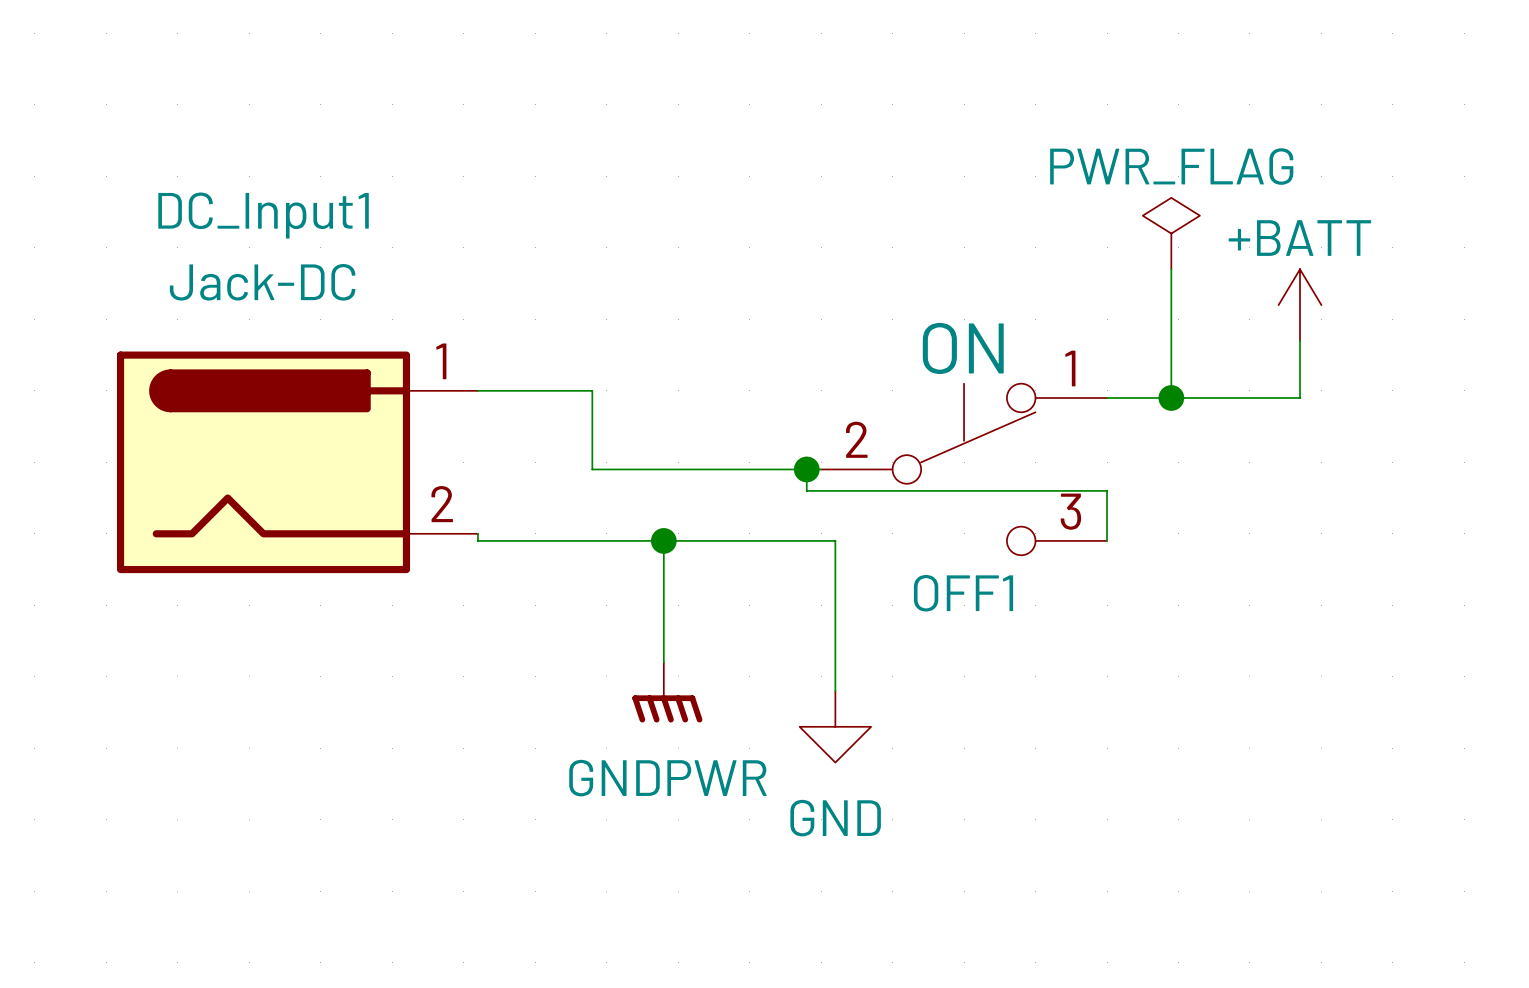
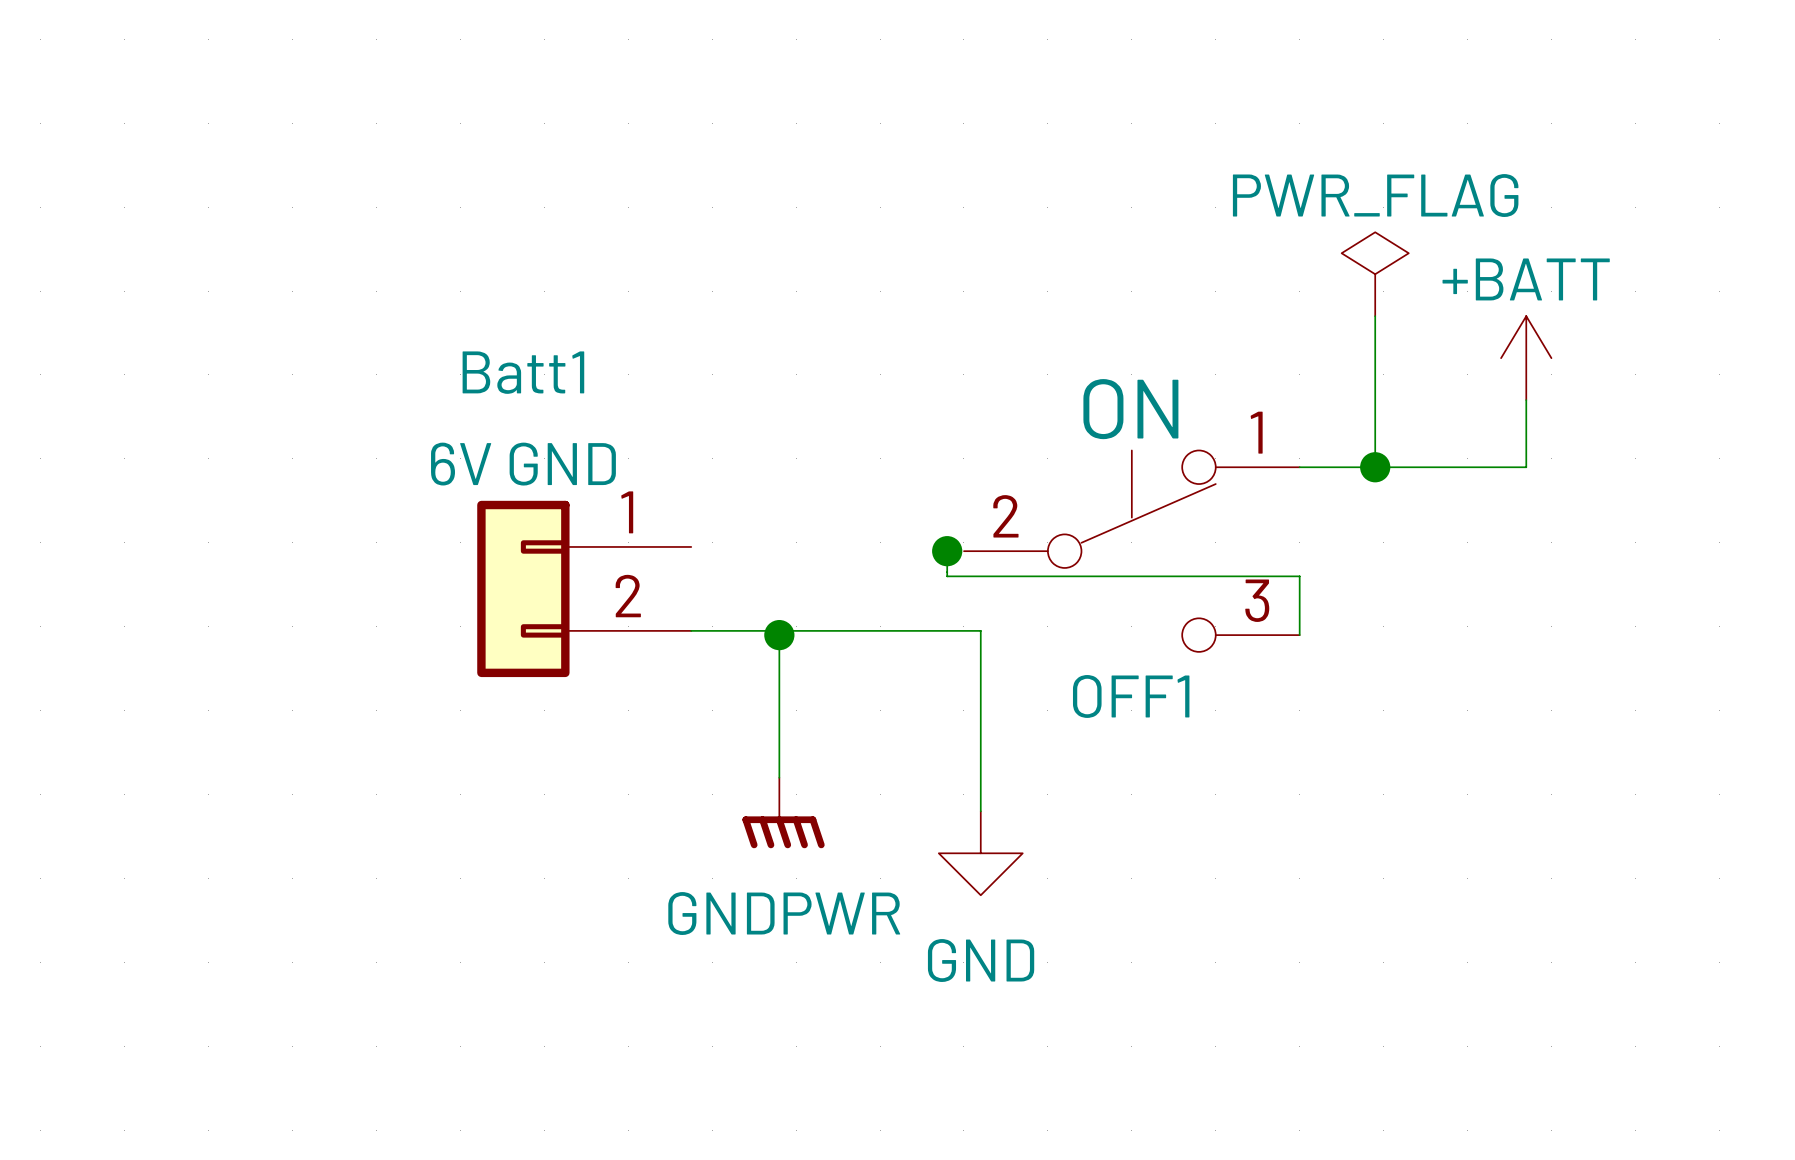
wire: (477, 390) (592, 390) (592, 469) (821, 469) -> none
DC_Input1: Jack-DC (297, 462) -> none
Batt1: none -> 6V GND (584, 588)
wire: (477, 533) (477, 540) (835, 540) -> (691, 630) (980, 630) (980, 635)

